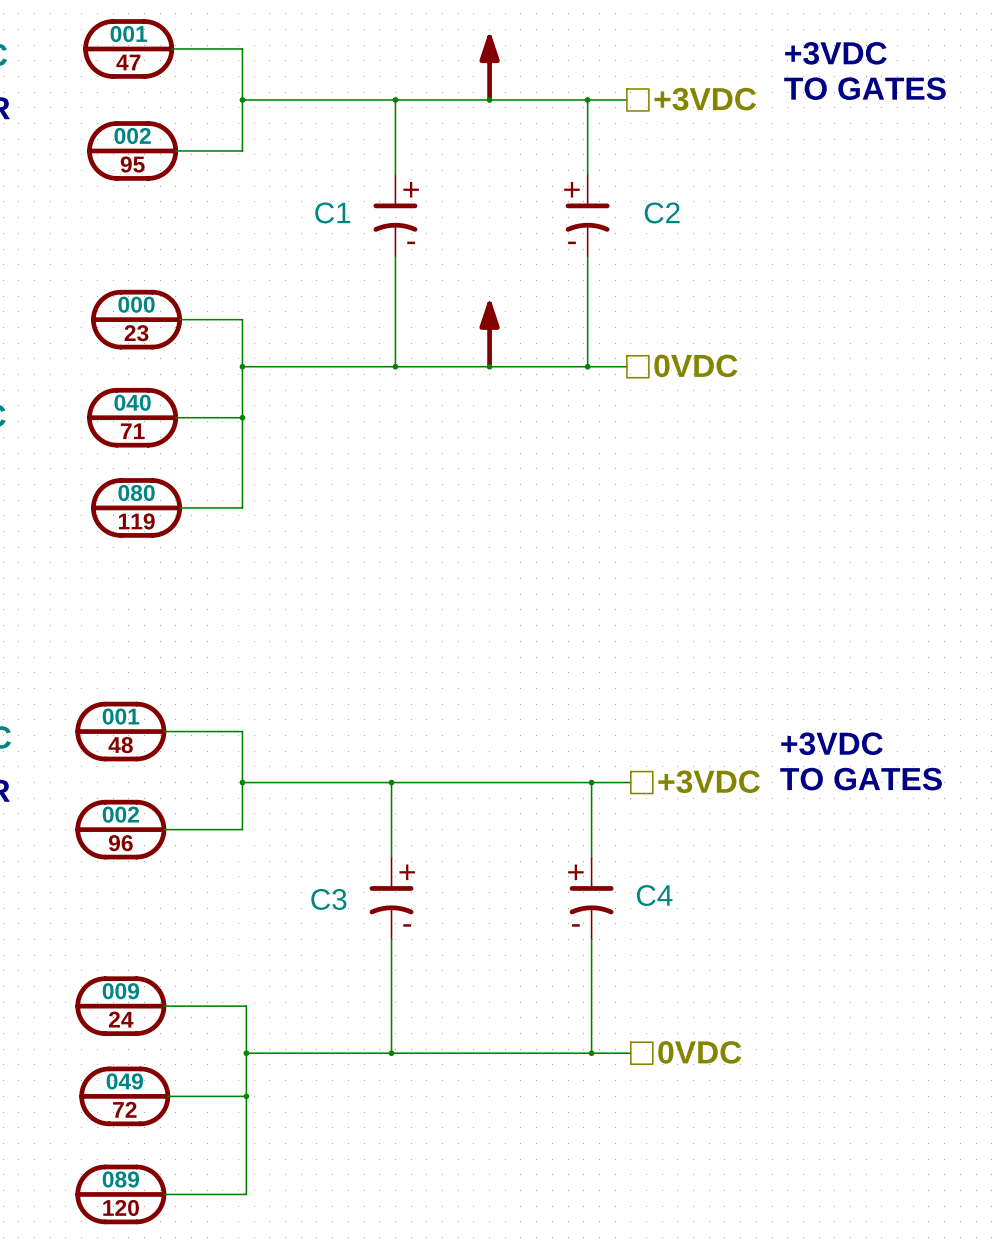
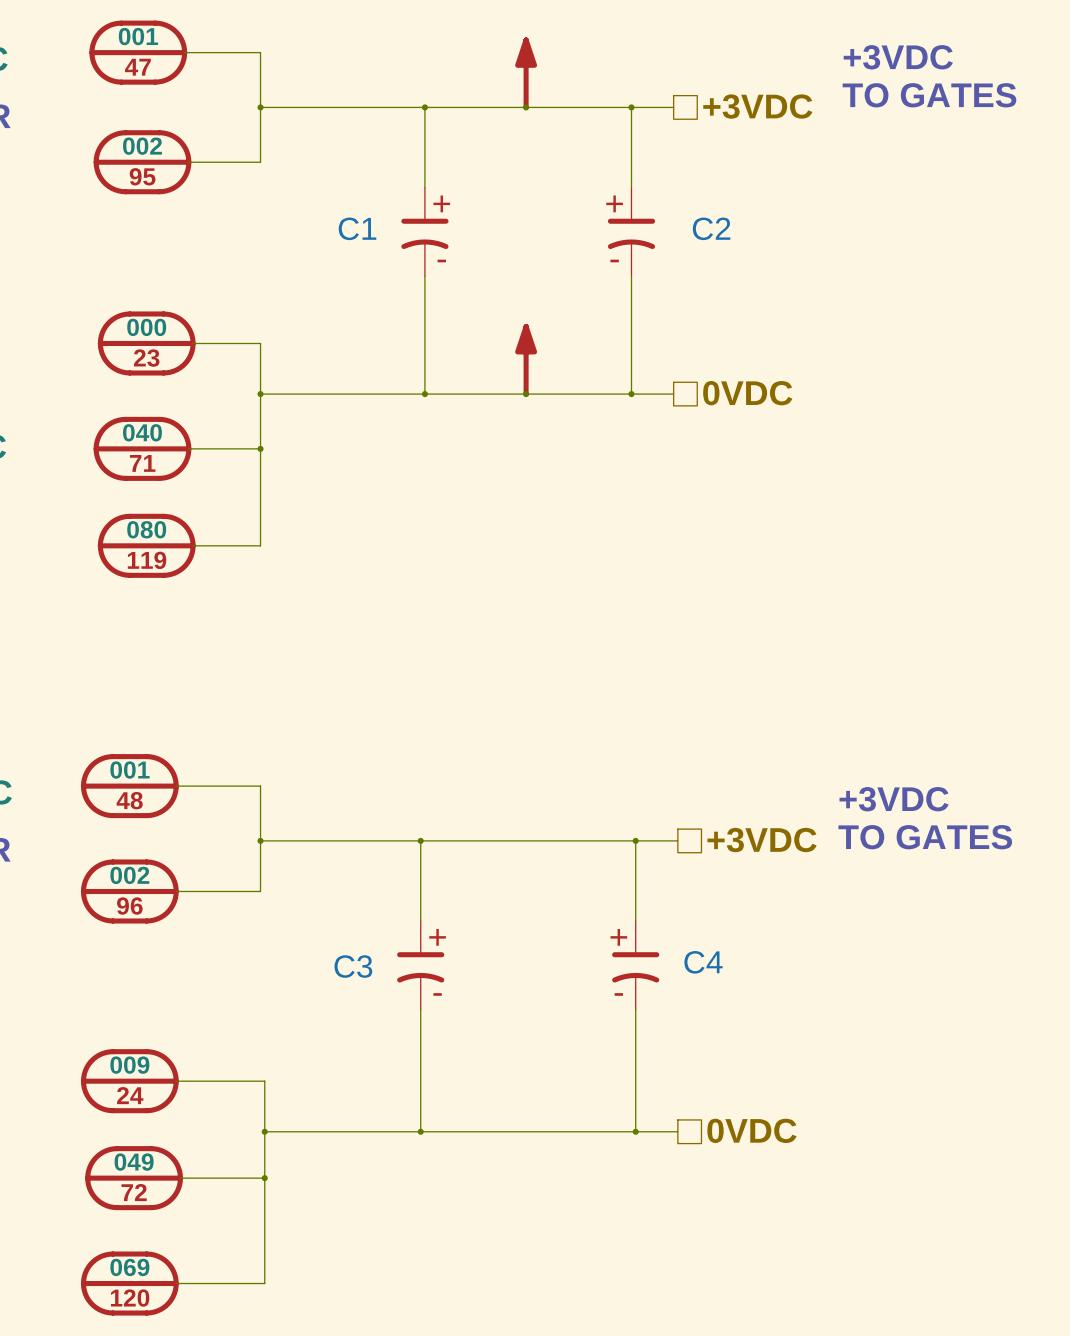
part text: 089 (120, 1179) -> 069 (129, 1267)

